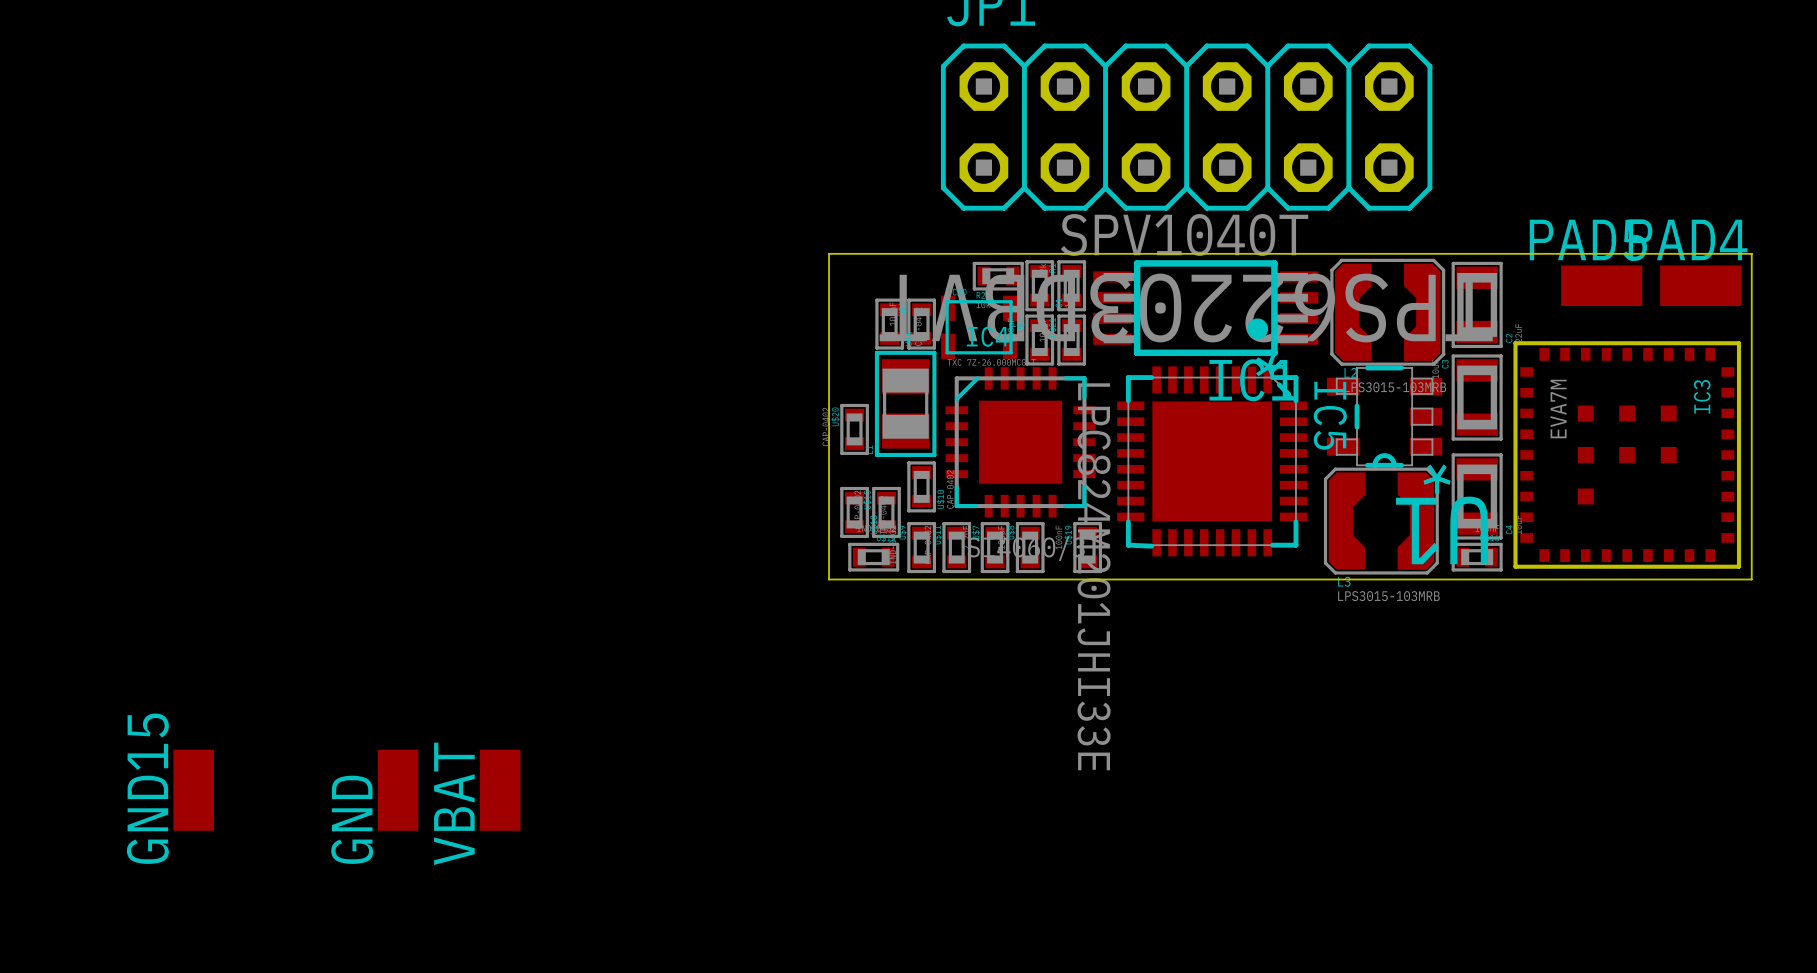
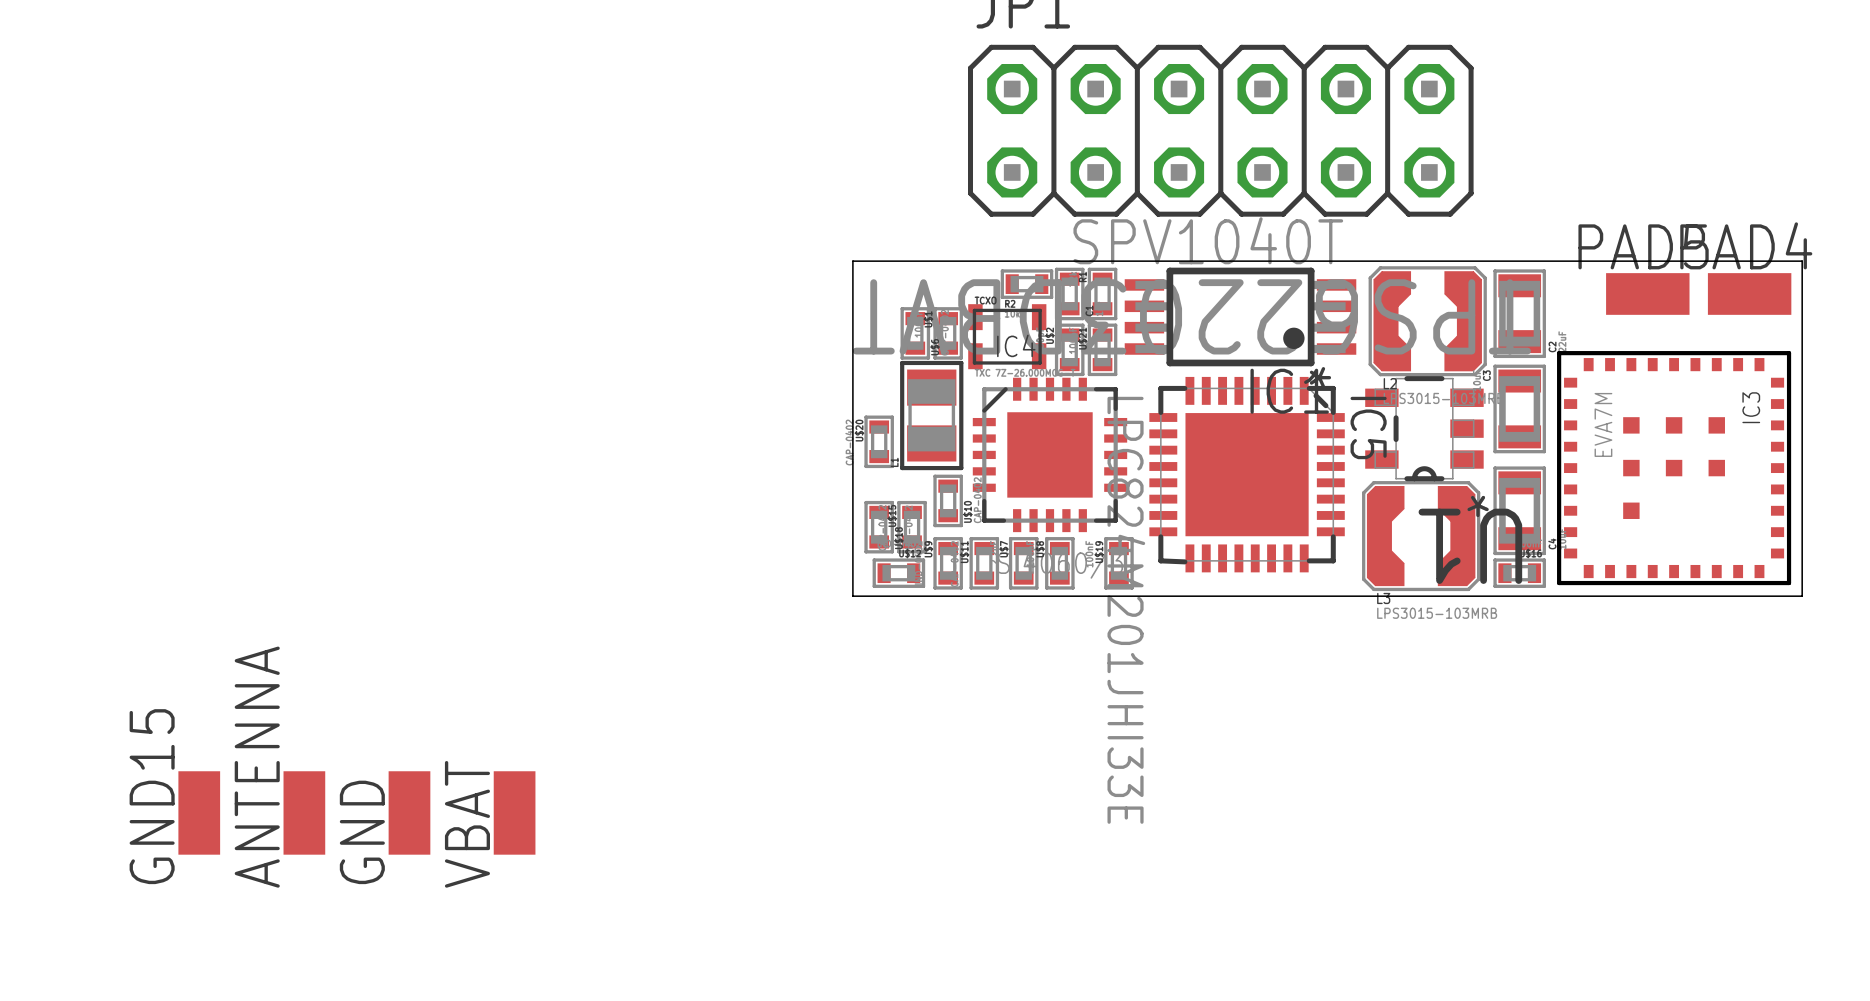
ANTENNA: none -> (304, 812)

